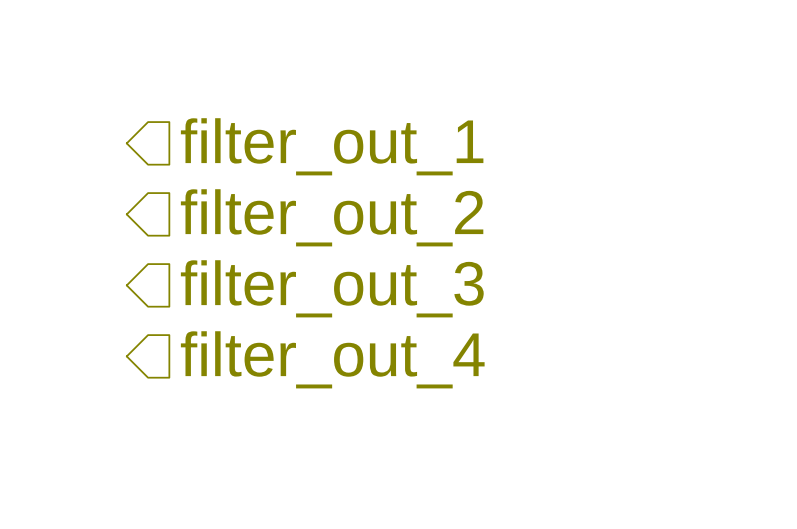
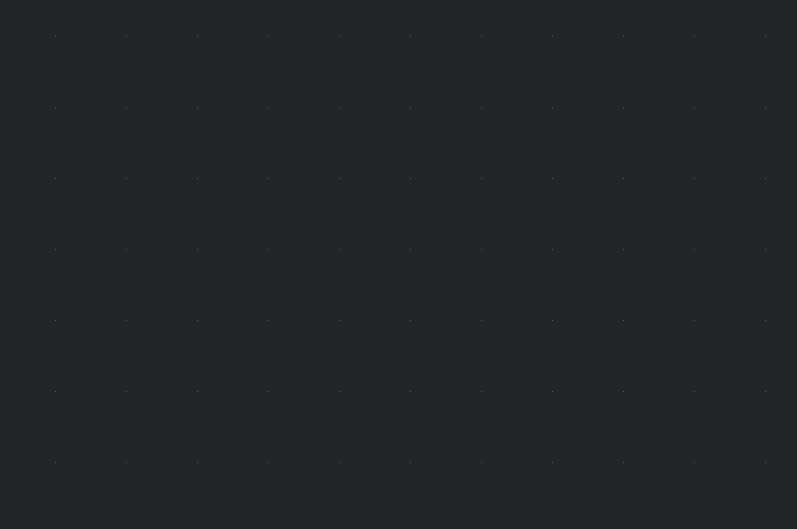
hierarchical label: filter_out_1 (332, 146) -> none
hierarchical label: filter_out_2 (332, 217) -> none
hierarchical label: filter_out_3 (332, 288) -> none
hierarchical label: filter_out_4 (332, 359) -> none

